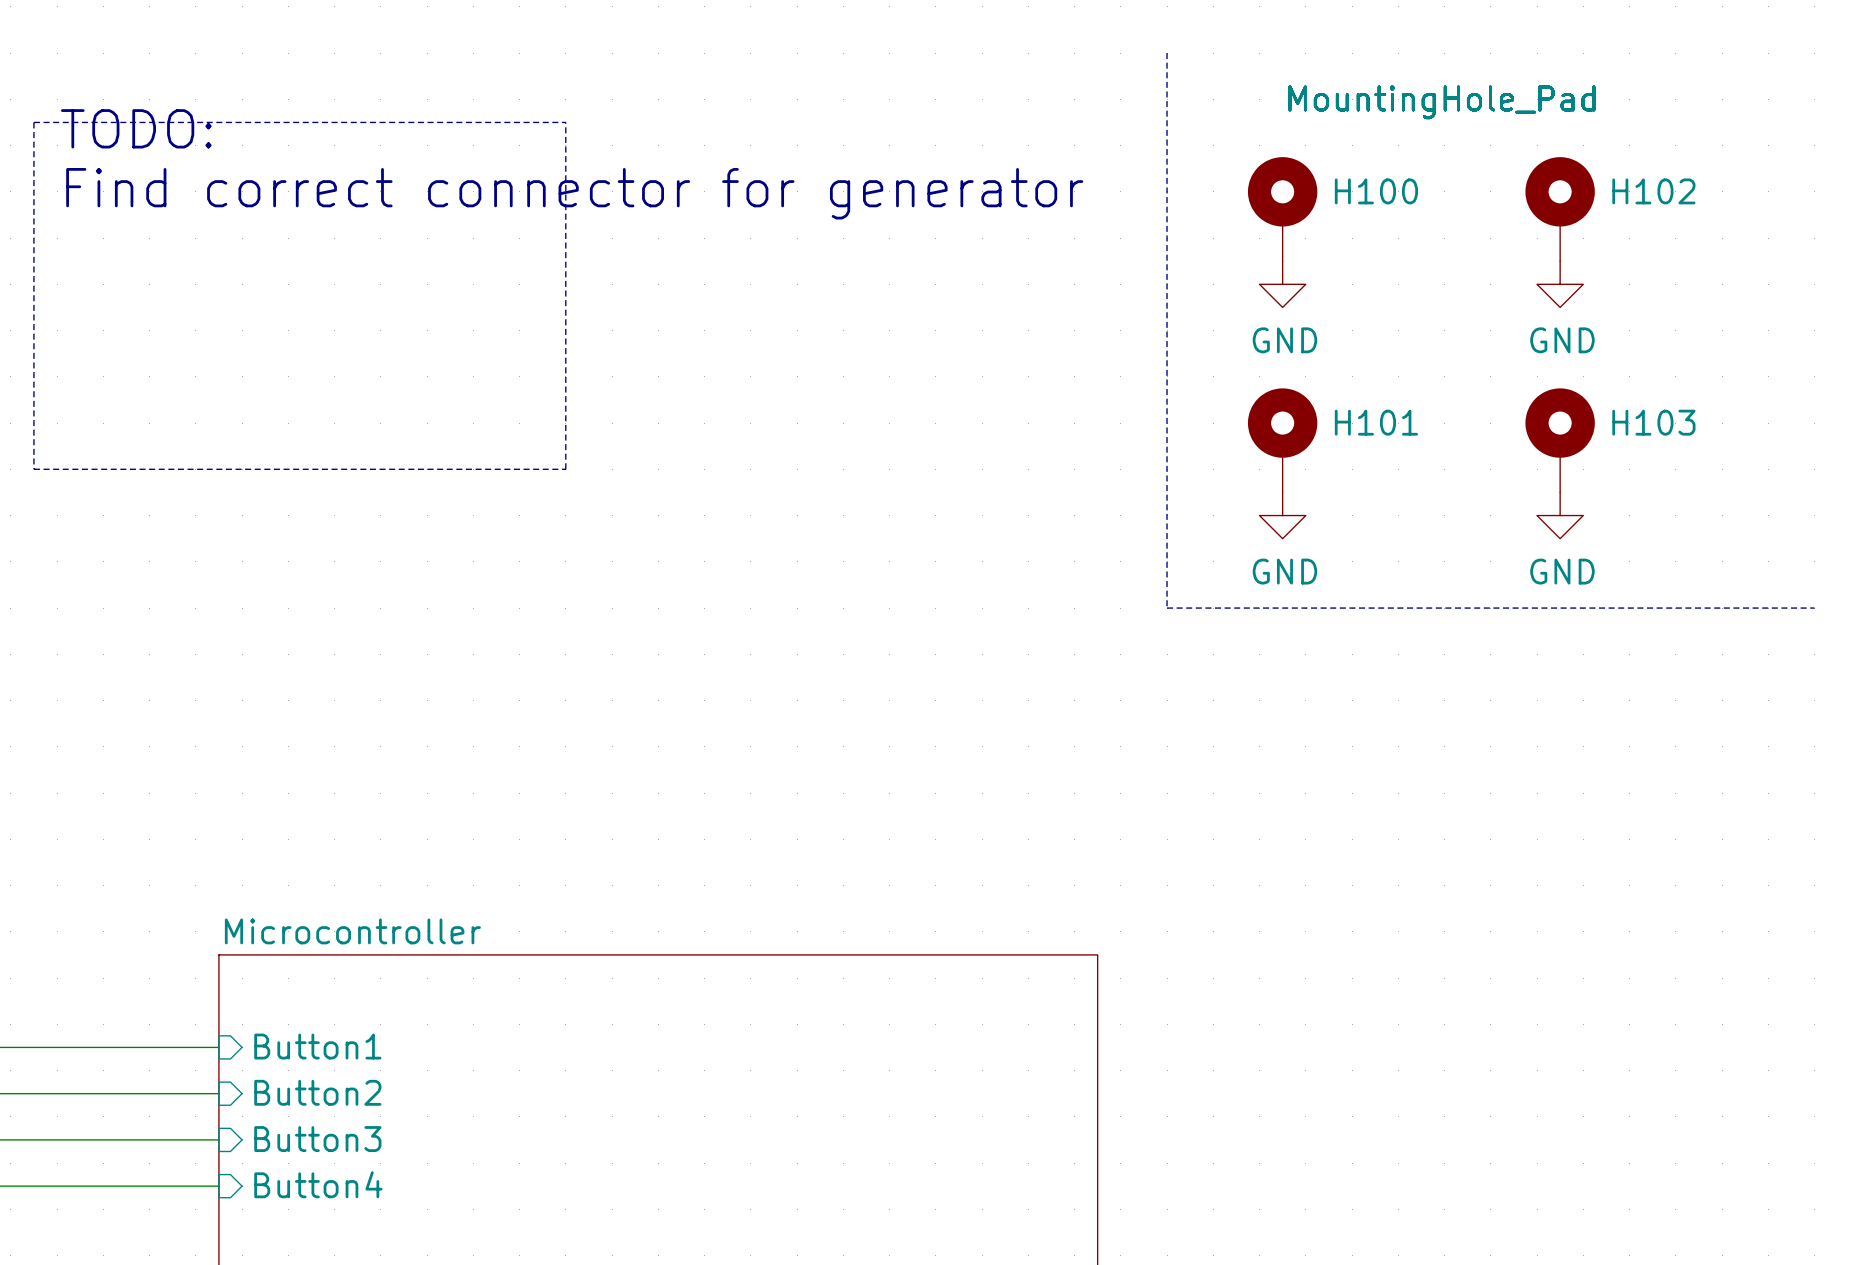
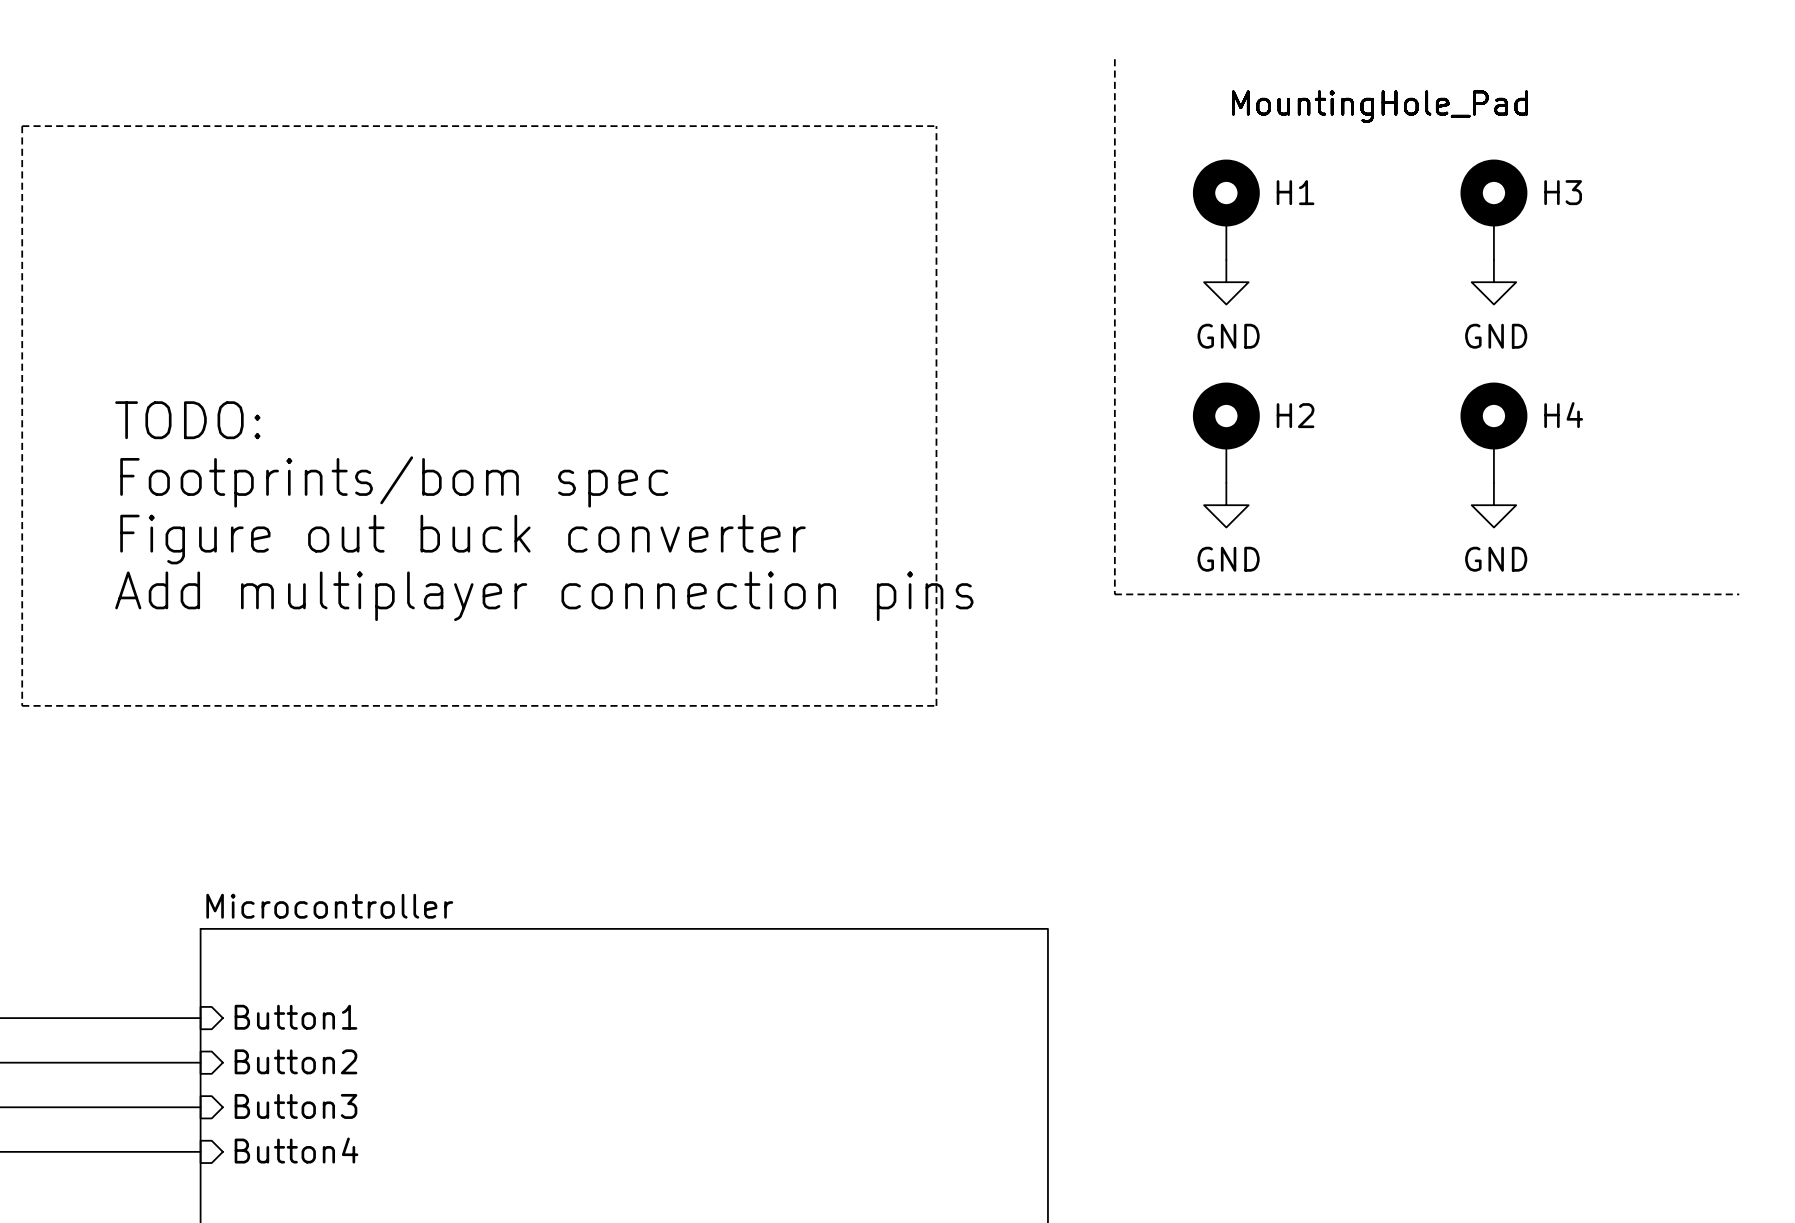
line: (565, 122) (565, 469) (33, 469) -> (535, 126) (936, 126) (936, 705) (22, 705) (22, 460)
text position: TODO: (136, 128) -> TODO: (187, 420)
H100 name: H100 (1376, 191) -> H1 (1295, 192)
H102 name: H102 (1653, 191) -> H3 (1563, 192)
text: Find correct connector for generator (574, 193) -> none
H101 name: H101 (1376, 422) -> H2 (1295, 415)
H103 name: H103 (1653, 422) -> H4 (1563, 415)
text: none -> Footprints/bom spec (394, 481)
text: none -> Figure out buck converter (462, 539)
text: none -> Add multiplayer connection pins (544, 596)

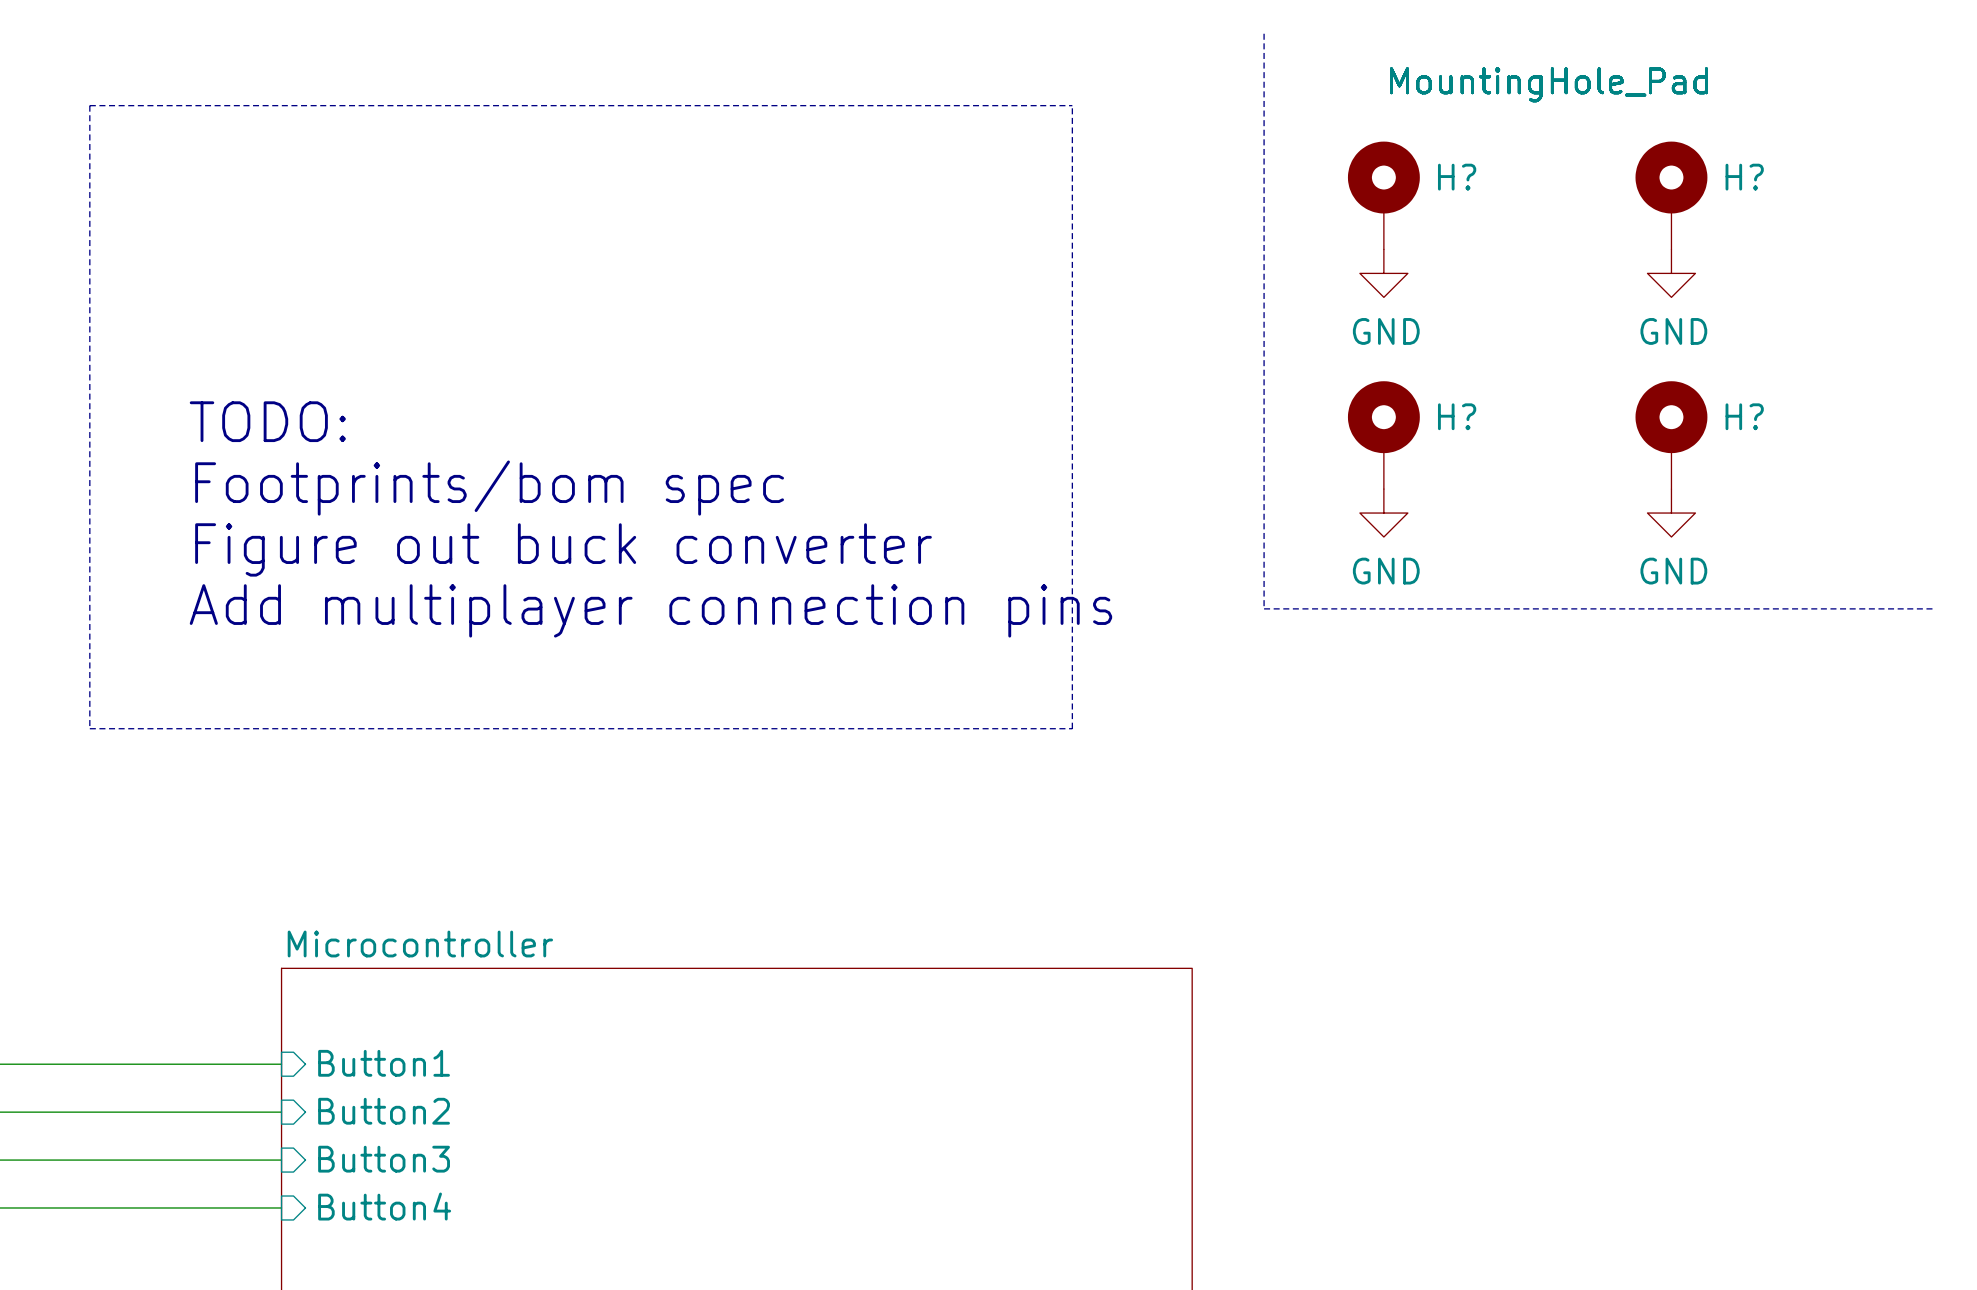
H1 name: H1 (1295, 192) -> H? (1457, 177)
H3 name: H3 (1563, 192) -> H? (1744, 177)
H2 name: H2 (1295, 415) -> H? (1457, 416)
H4 name: H4 (1563, 415) -> H? (1744, 416)

